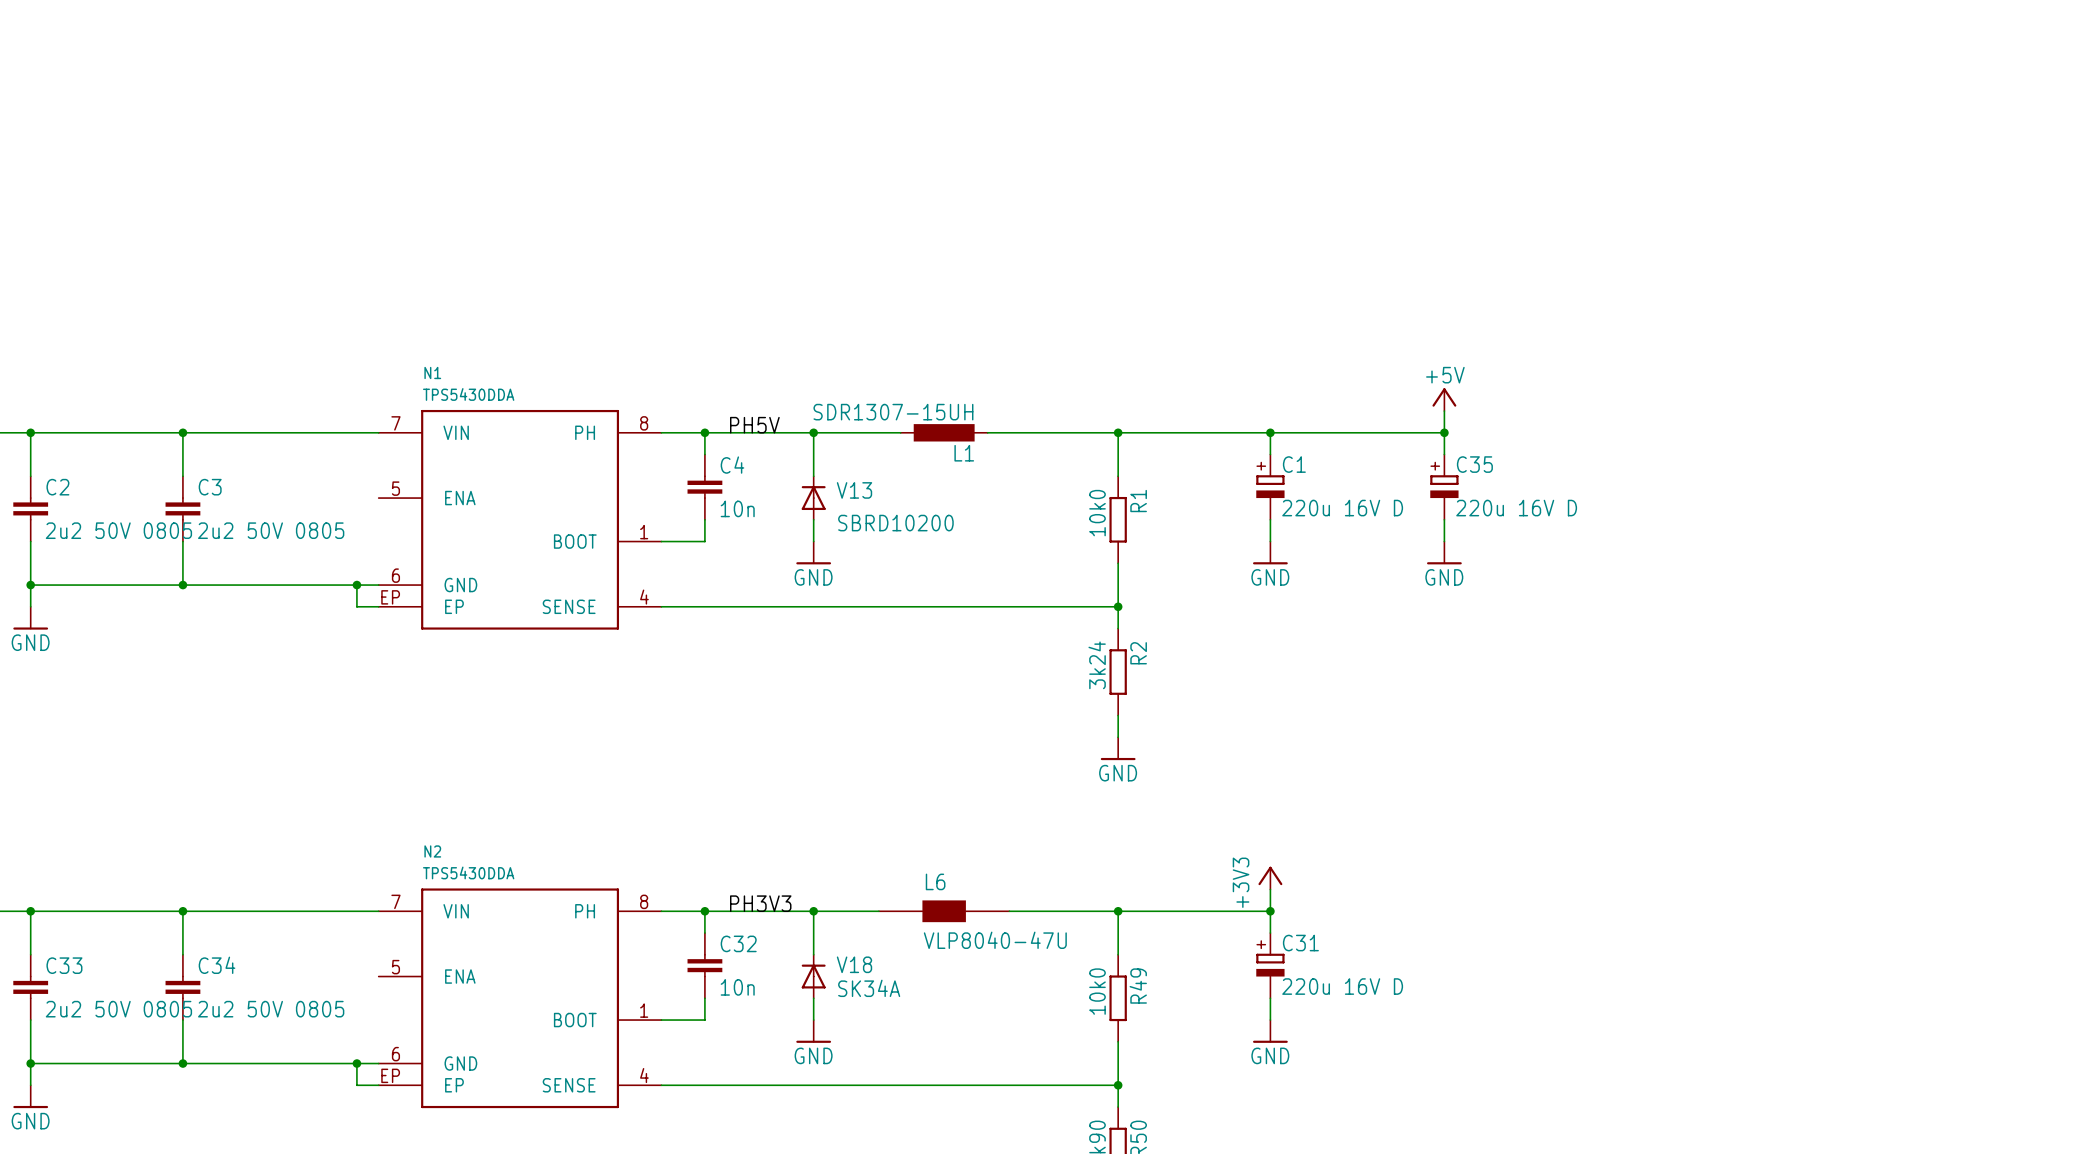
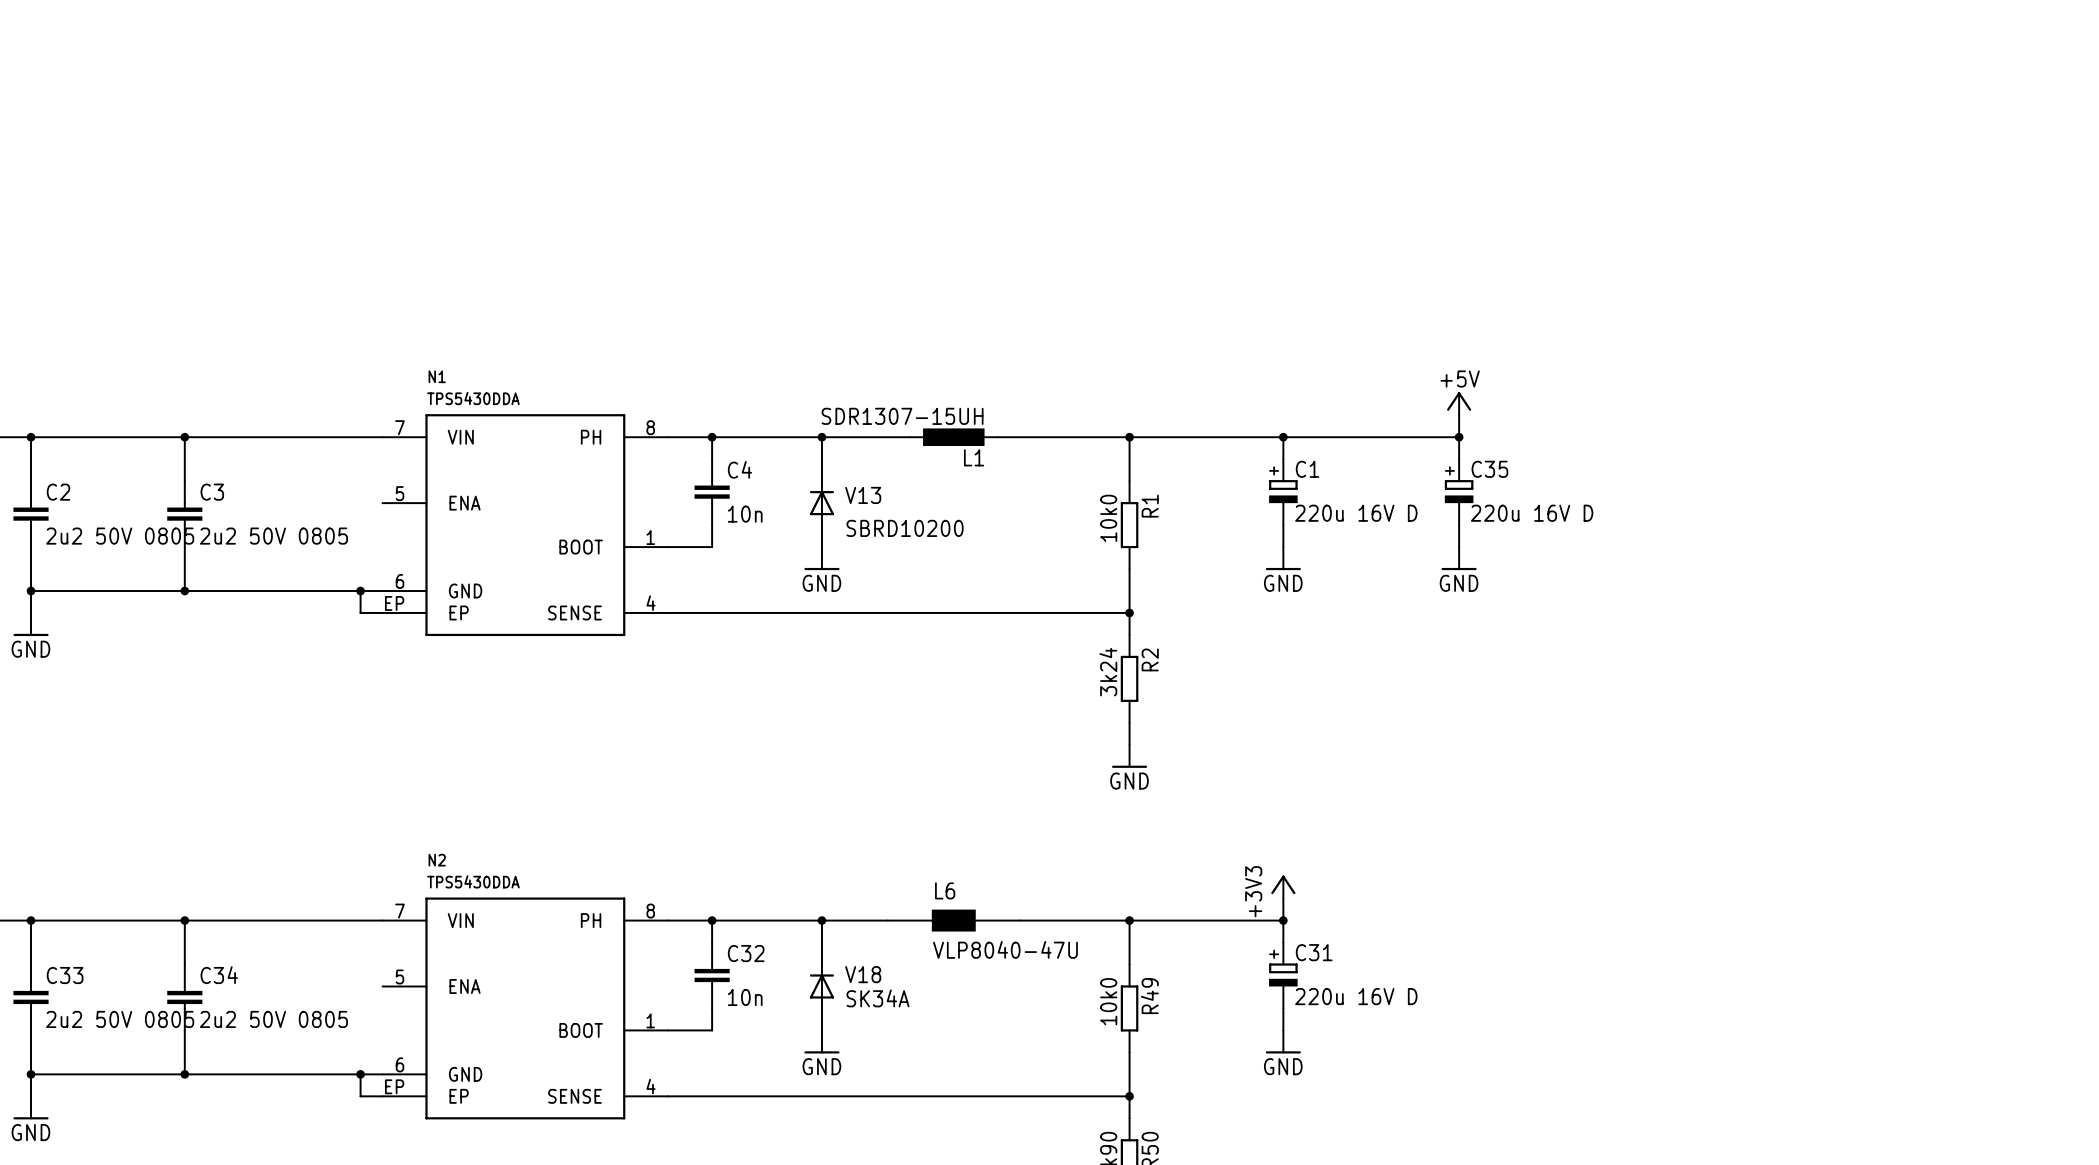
label: PH5V (754, 425) -> none
label: PH3V3 (760, 903) -> none

